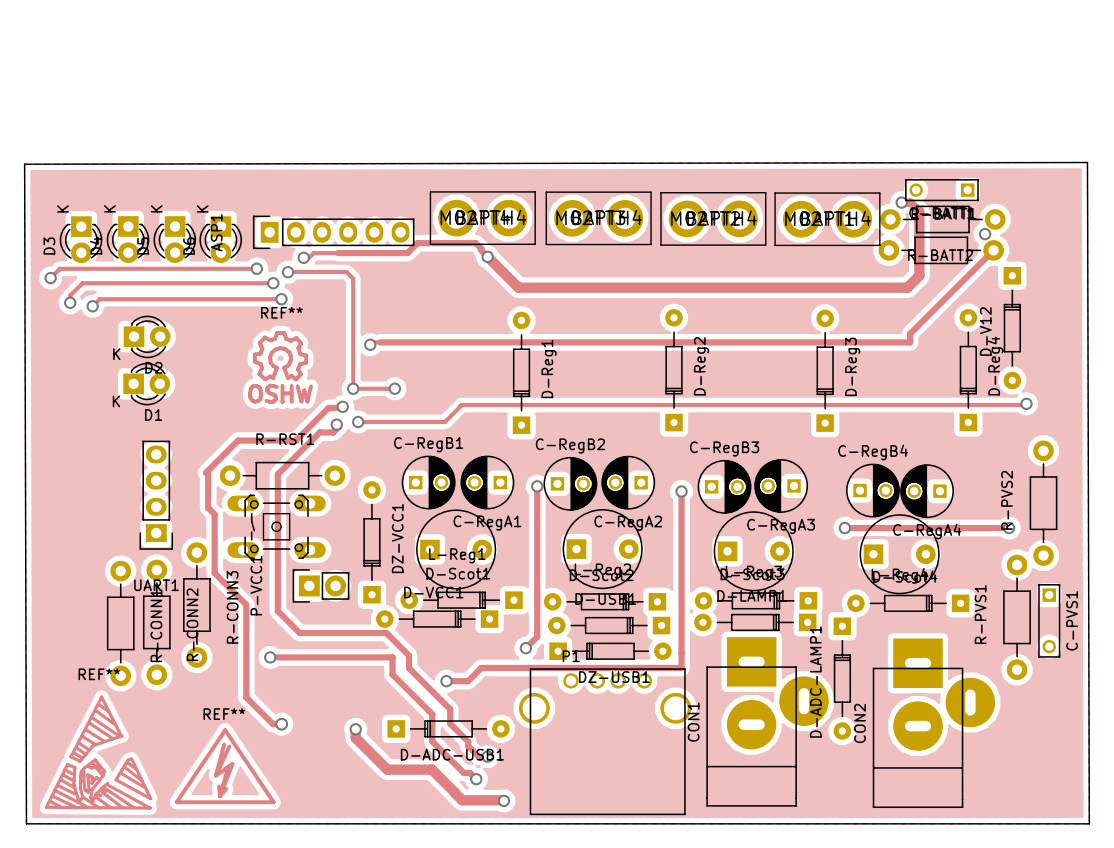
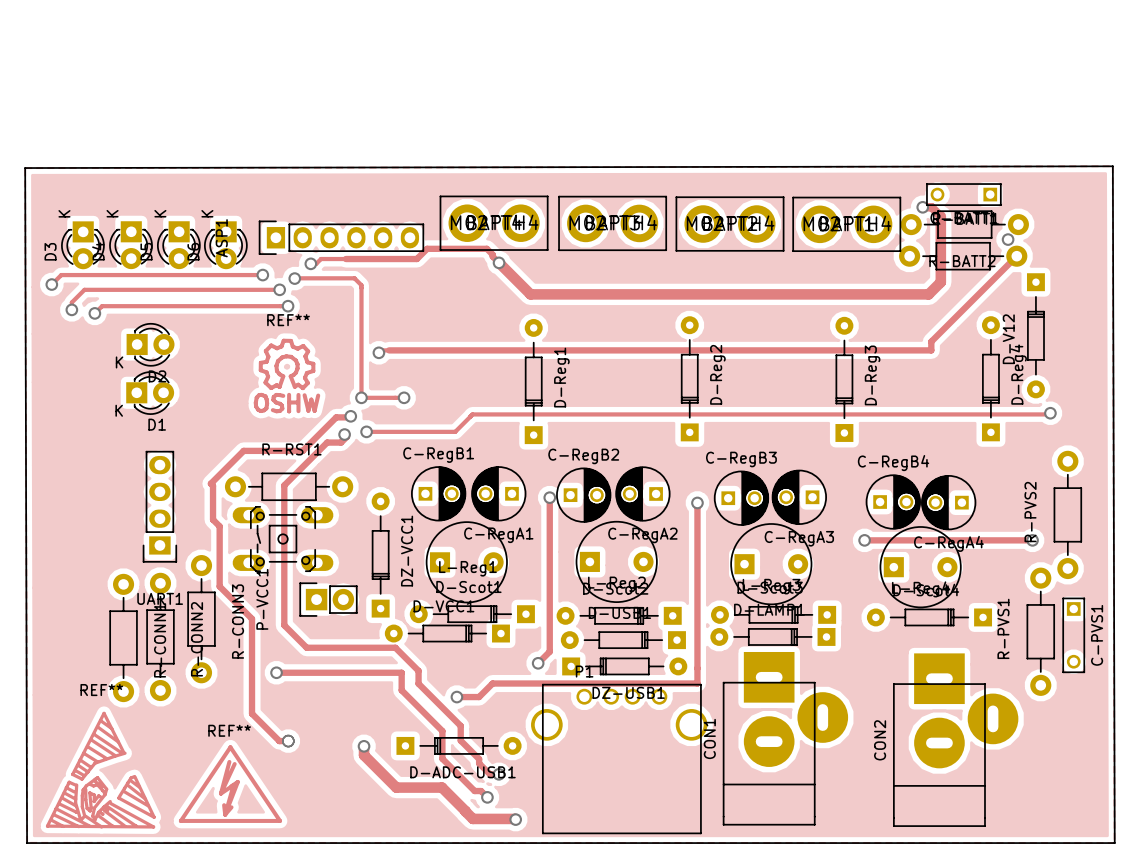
D-ADC-LAMP1: (842, 678) -> none

